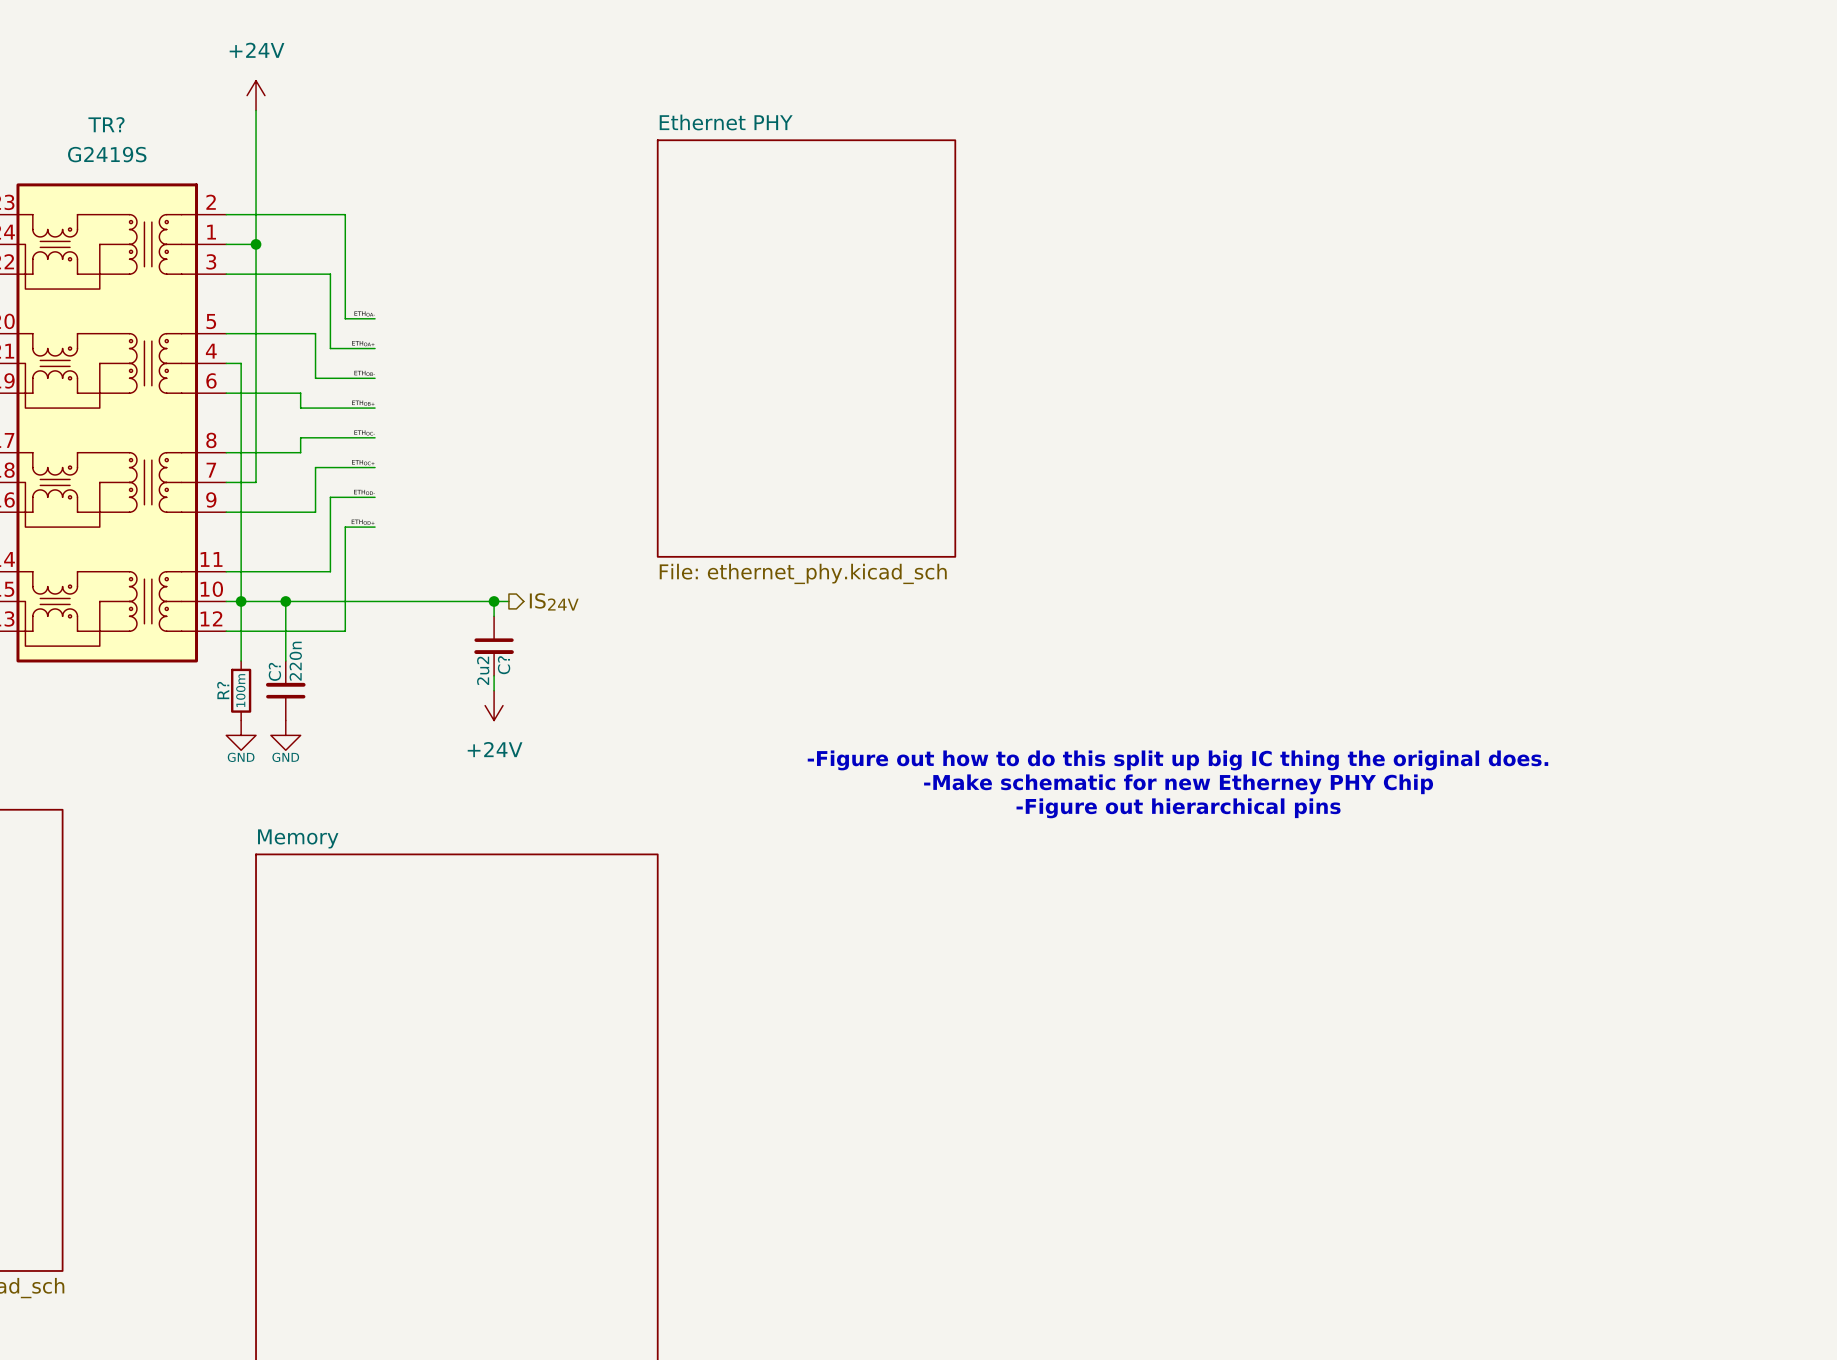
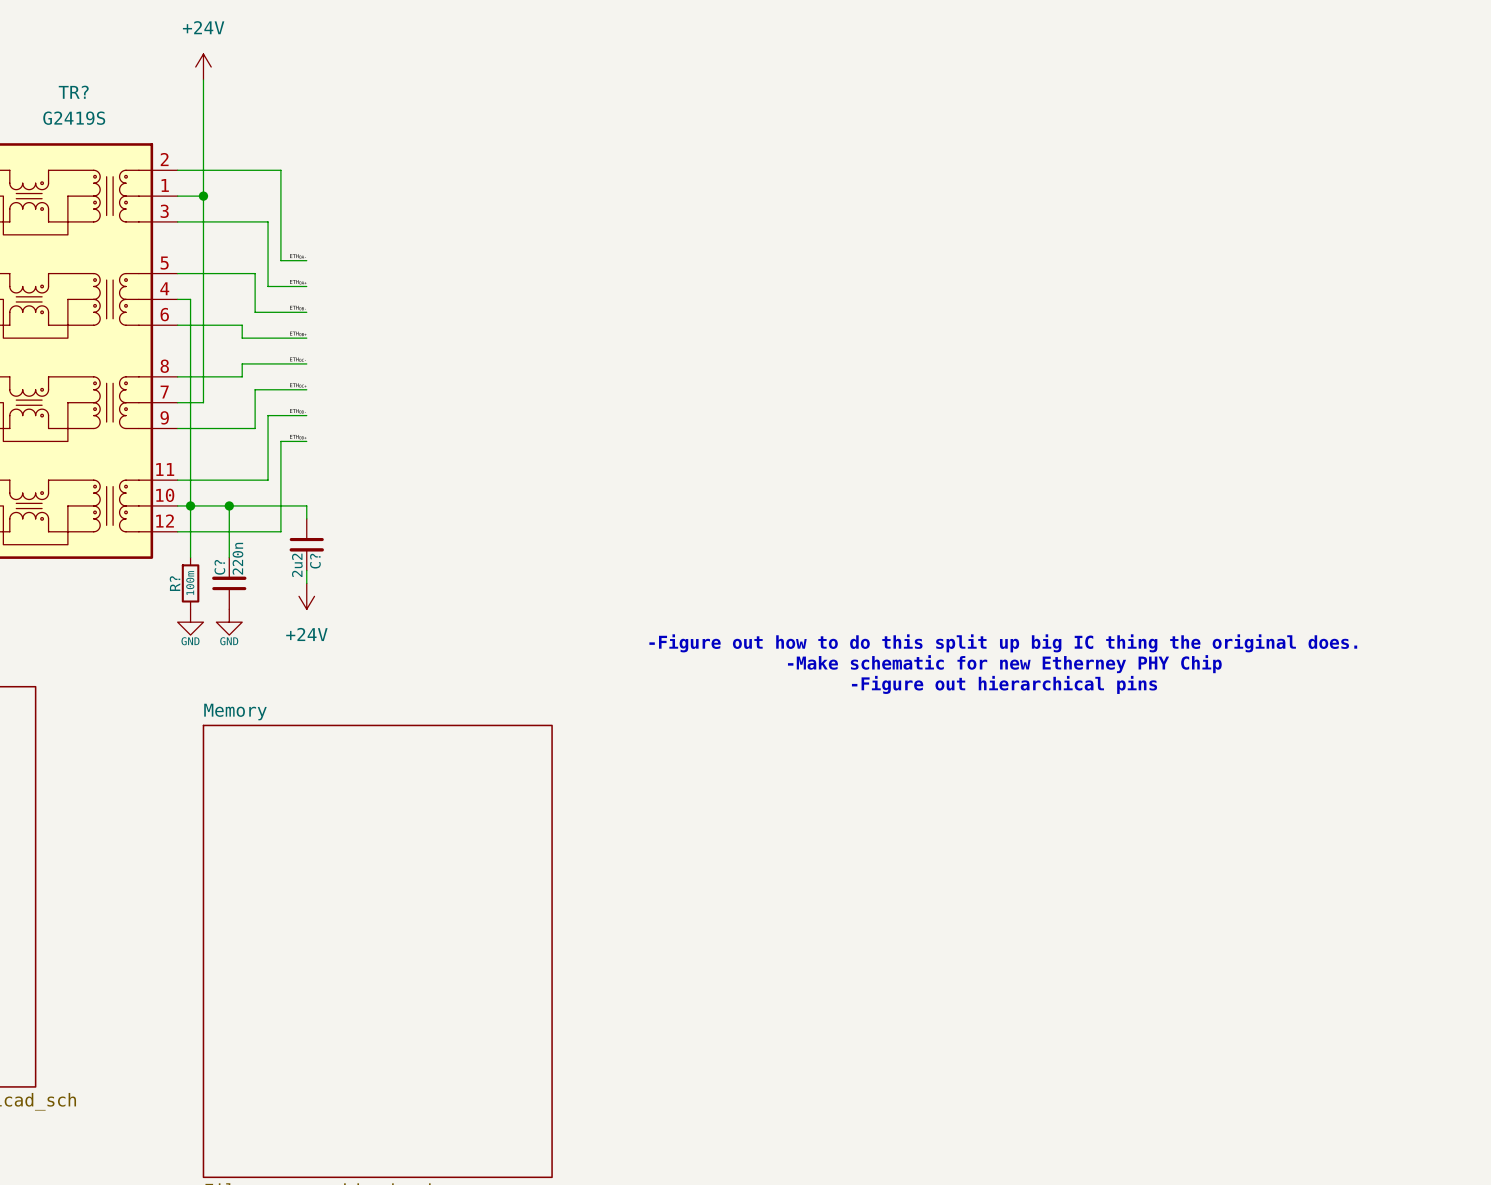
sheet Ethernet PHY: File: ethernet_phy.kicad_sch (806, 348) -> none
wire: (375, 601) (508, 601) -> (306, 505) (306, 518)
wire: (494, 601) (494, 616) -> none
junction: (494, 601) -> none
hierarchical label: IS24V (554, 601) -> none
C? position: (494, 646) -> (306, 544)
wire: (494, 675) (494, 690) -> (306, 570) (306, 583)
power symbol position: +24V (494, 705) -> +24V (306, 596)

